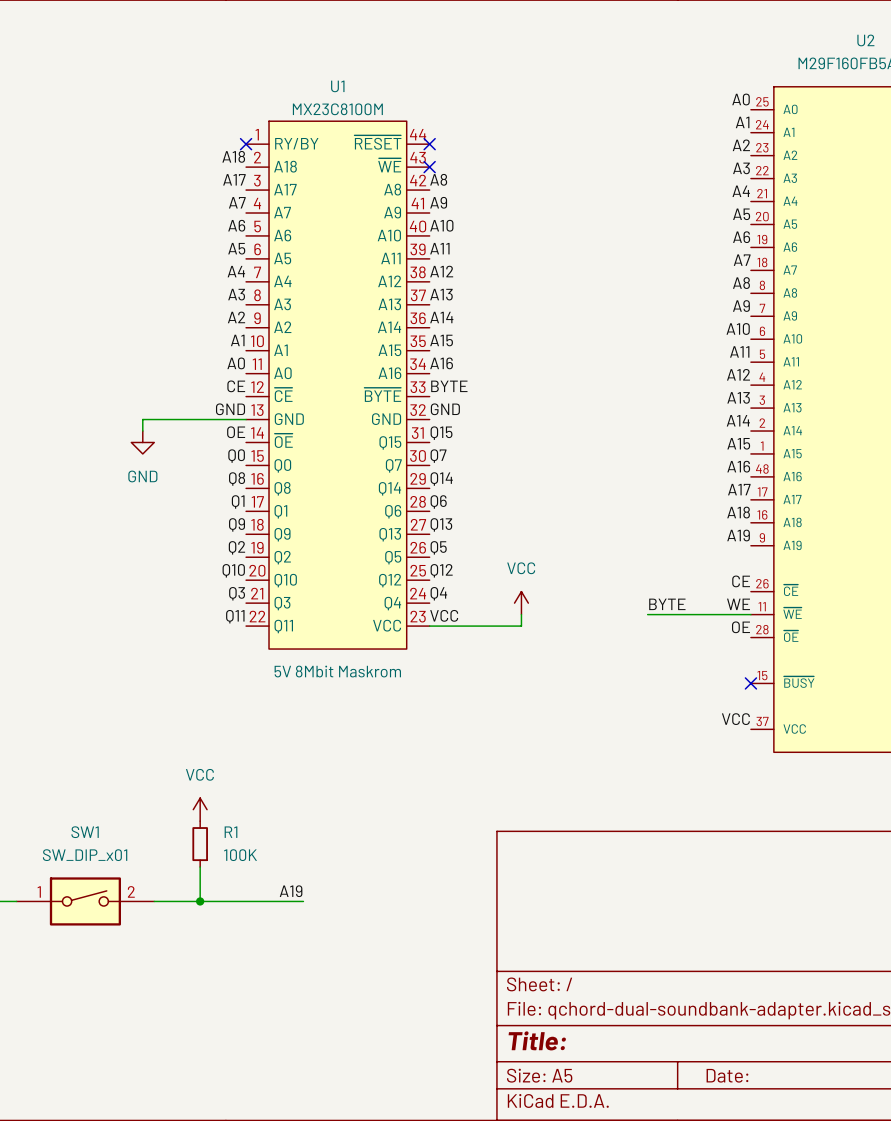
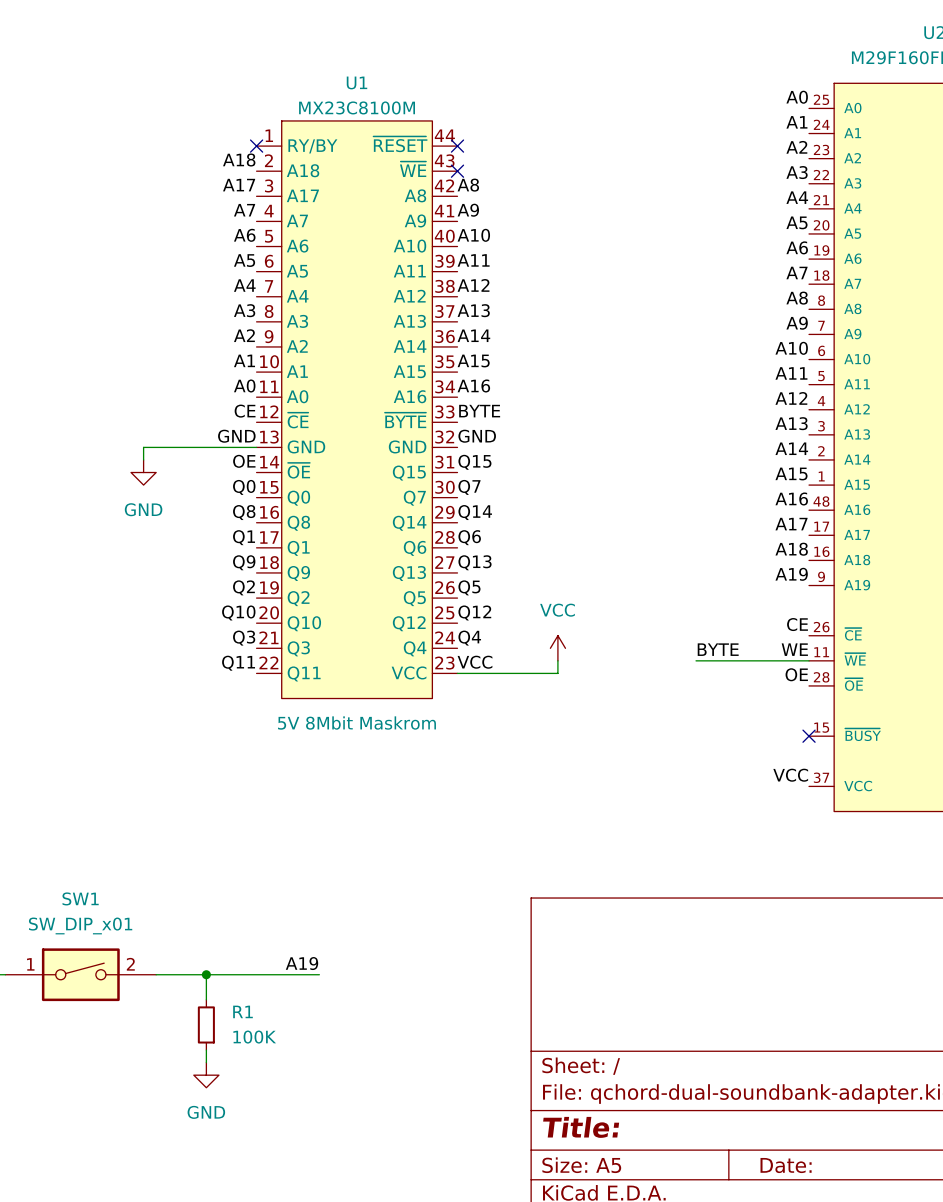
power symbol: VCC (200, 809) -> none
R1 position: (200, 844) -> (206, 1024)
wire: (200, 867) (200, 901) -> (206, 999) (206, 974)
wire: none -> (206, 1050) (206, 1062)
power symbol: none -> GND (206, 1075)

